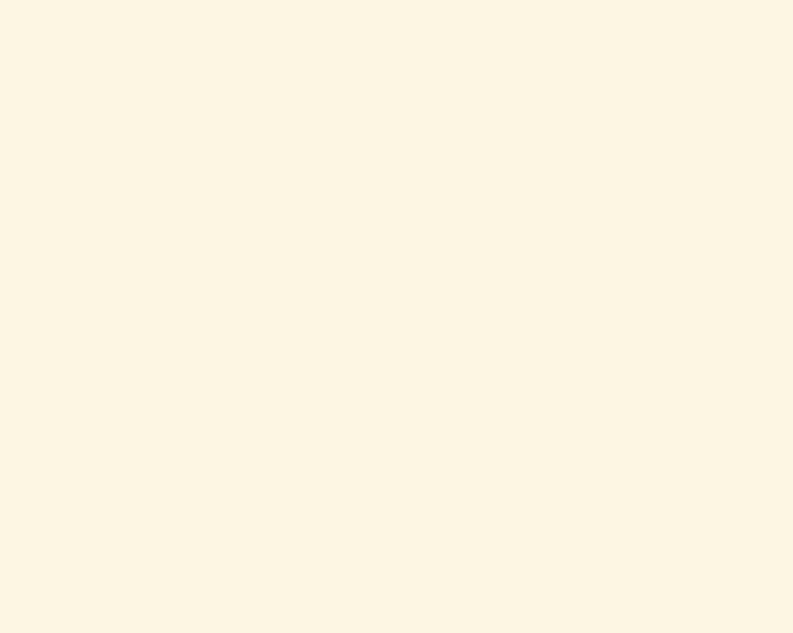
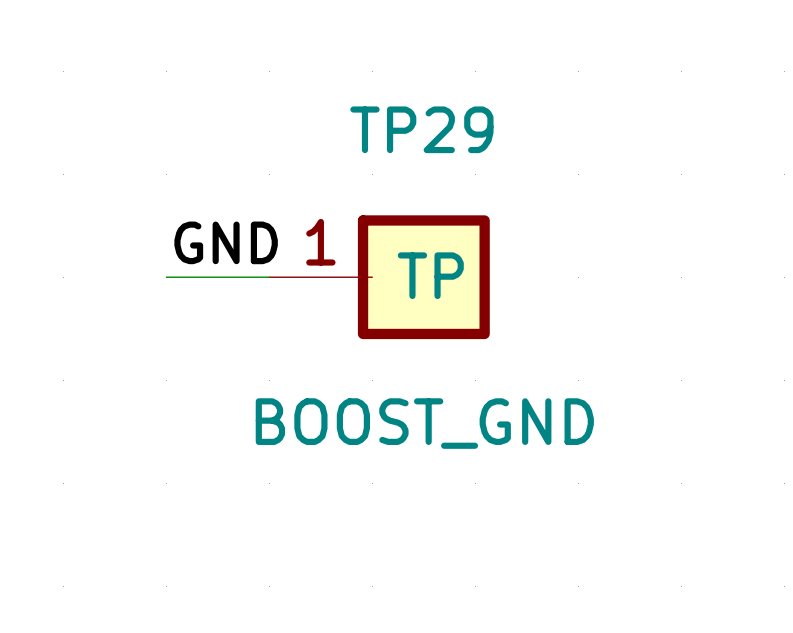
label: none -> GND (226, 242)
wire: none -> (166, 277) (269, 277)
TP29: none -> BOOST_GND (379, 277)

